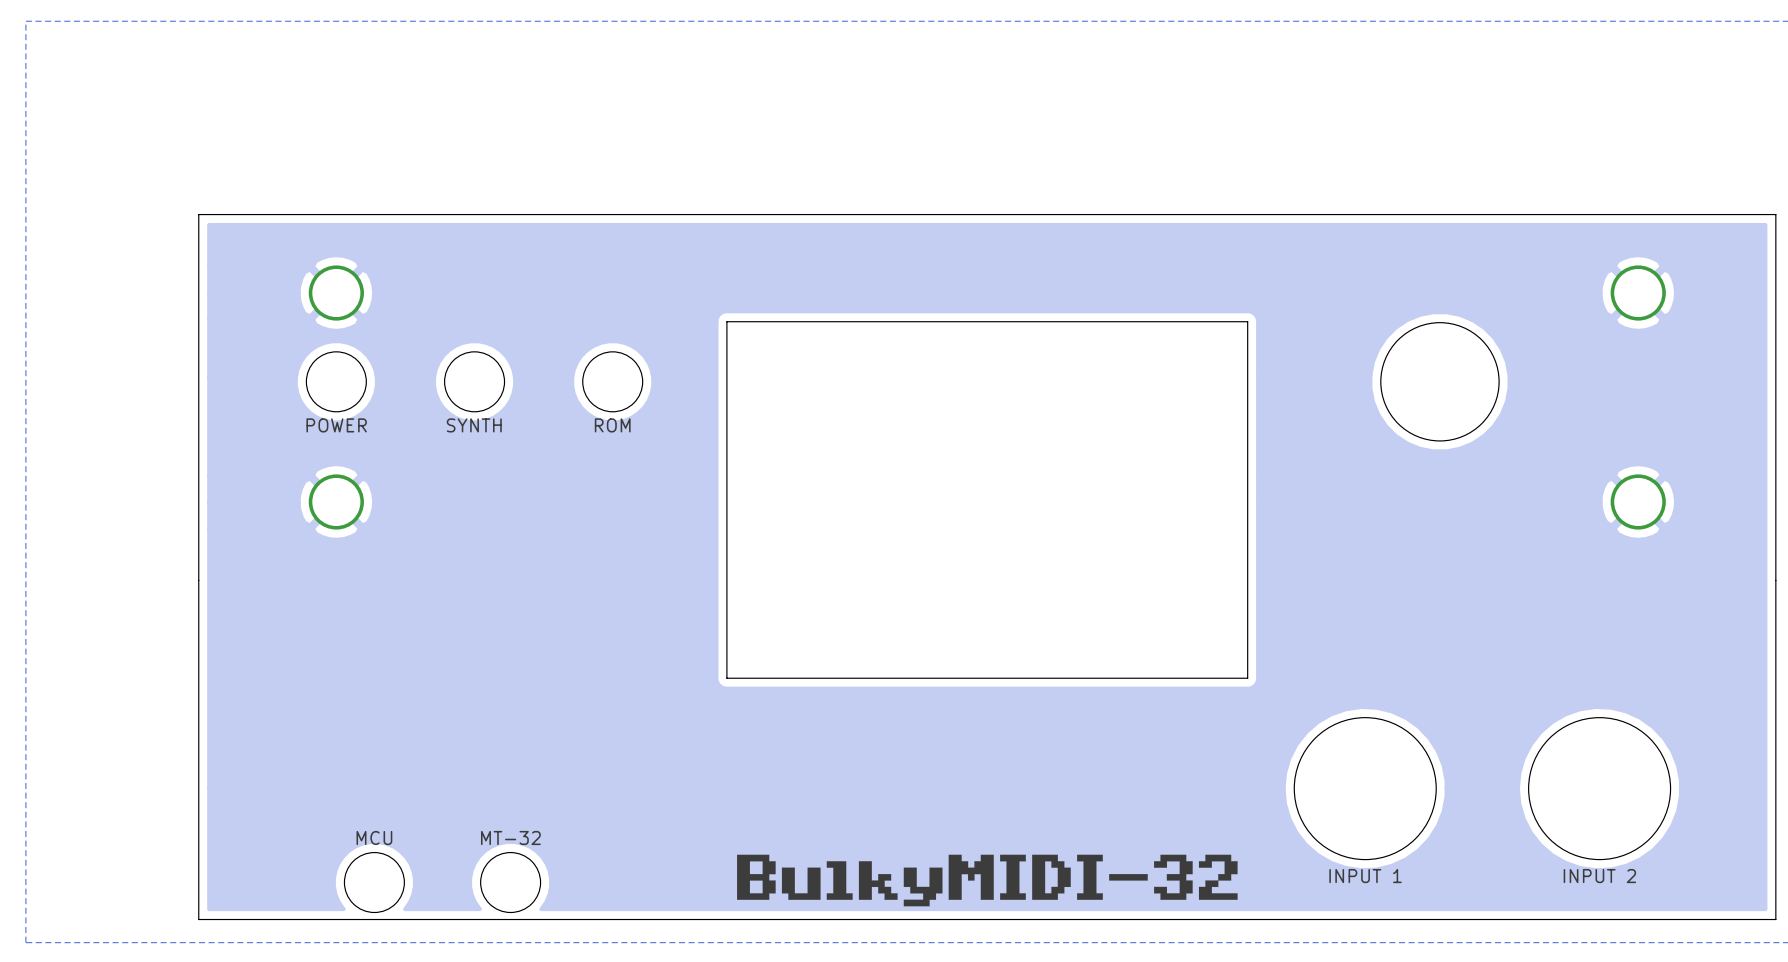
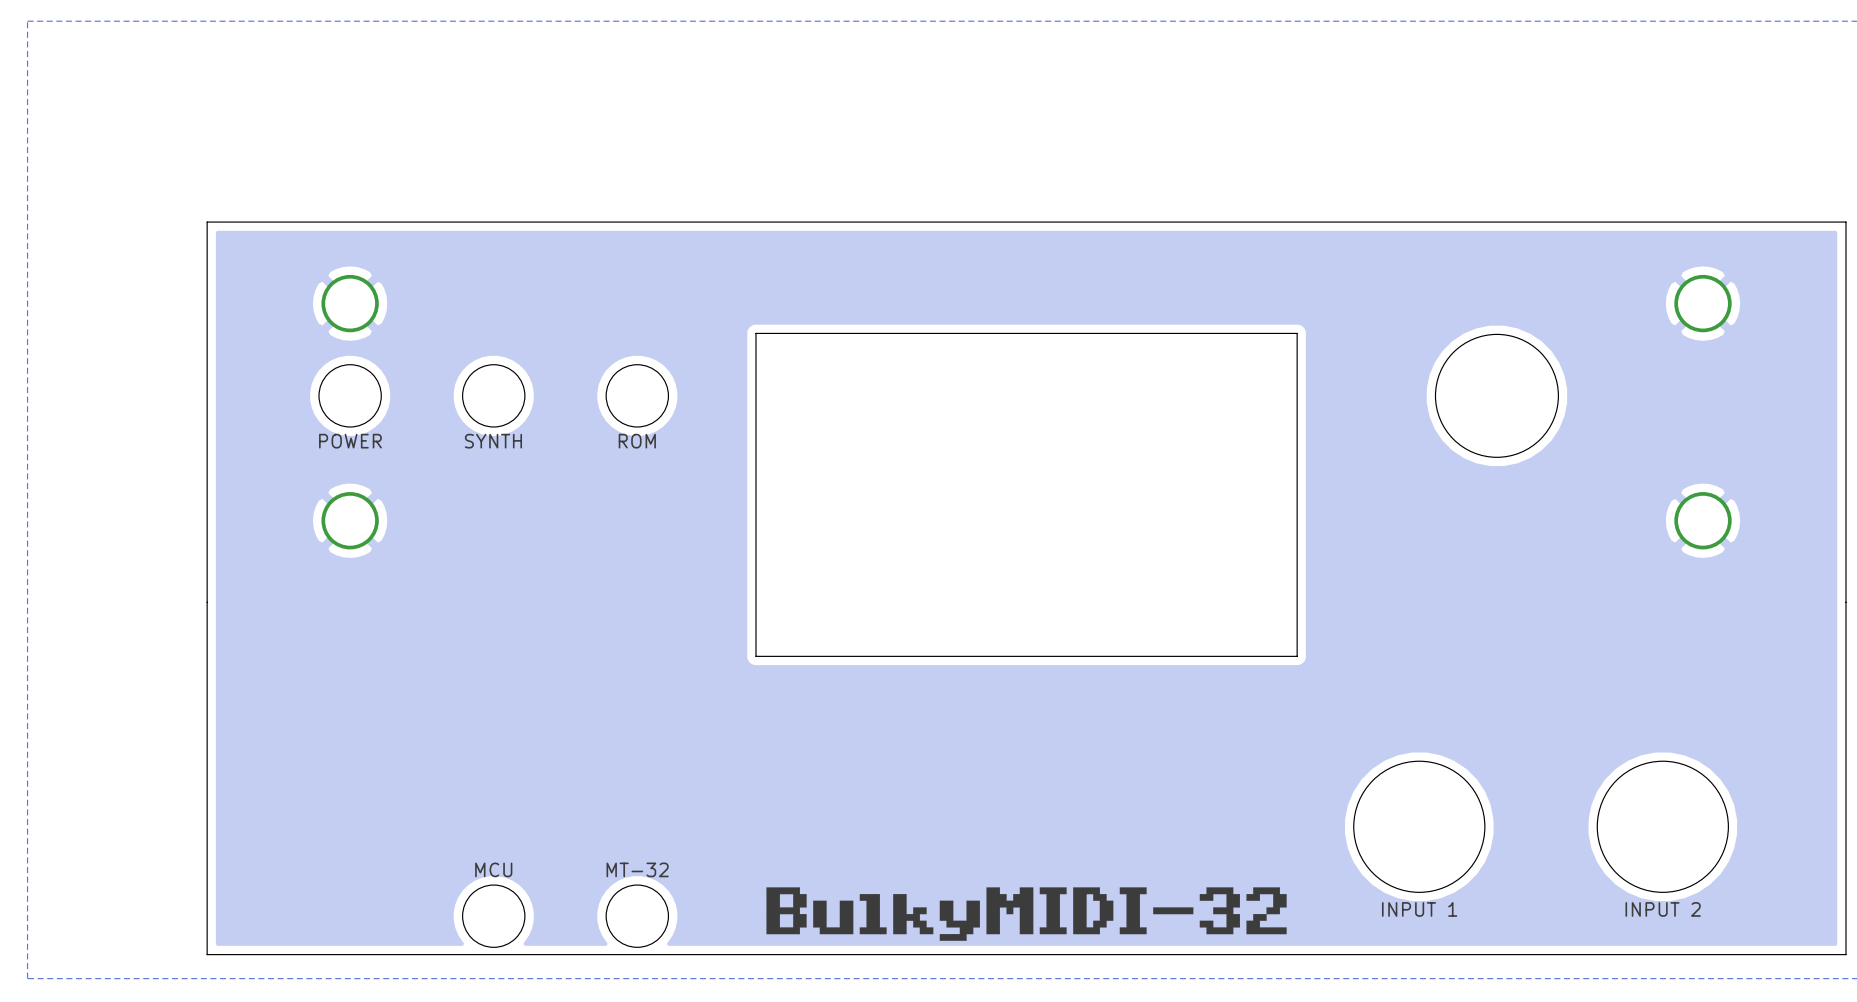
board edge: (726, 632) (726, 678) (1247, 678) (1247, 632) -> (755, 656) (1297, 656)
round board edge size: [1293, 717, 1437, 860] -> [1353, 760, 1486, 893]
round board edge size: [1528, 717, 1671, 860] -> [1596, 760, 1729, 893]
text position: MCU (374, 837) -> MCU (493, 869)
text position: MT-32 (510, 837) -> MT-32 (637, 869)
round board edge: [344, 852, 405, 913] -> none
round board edge: none -> [605, 884, 669, 948]
round board edge position: (510, 882) -> (493, 916)

